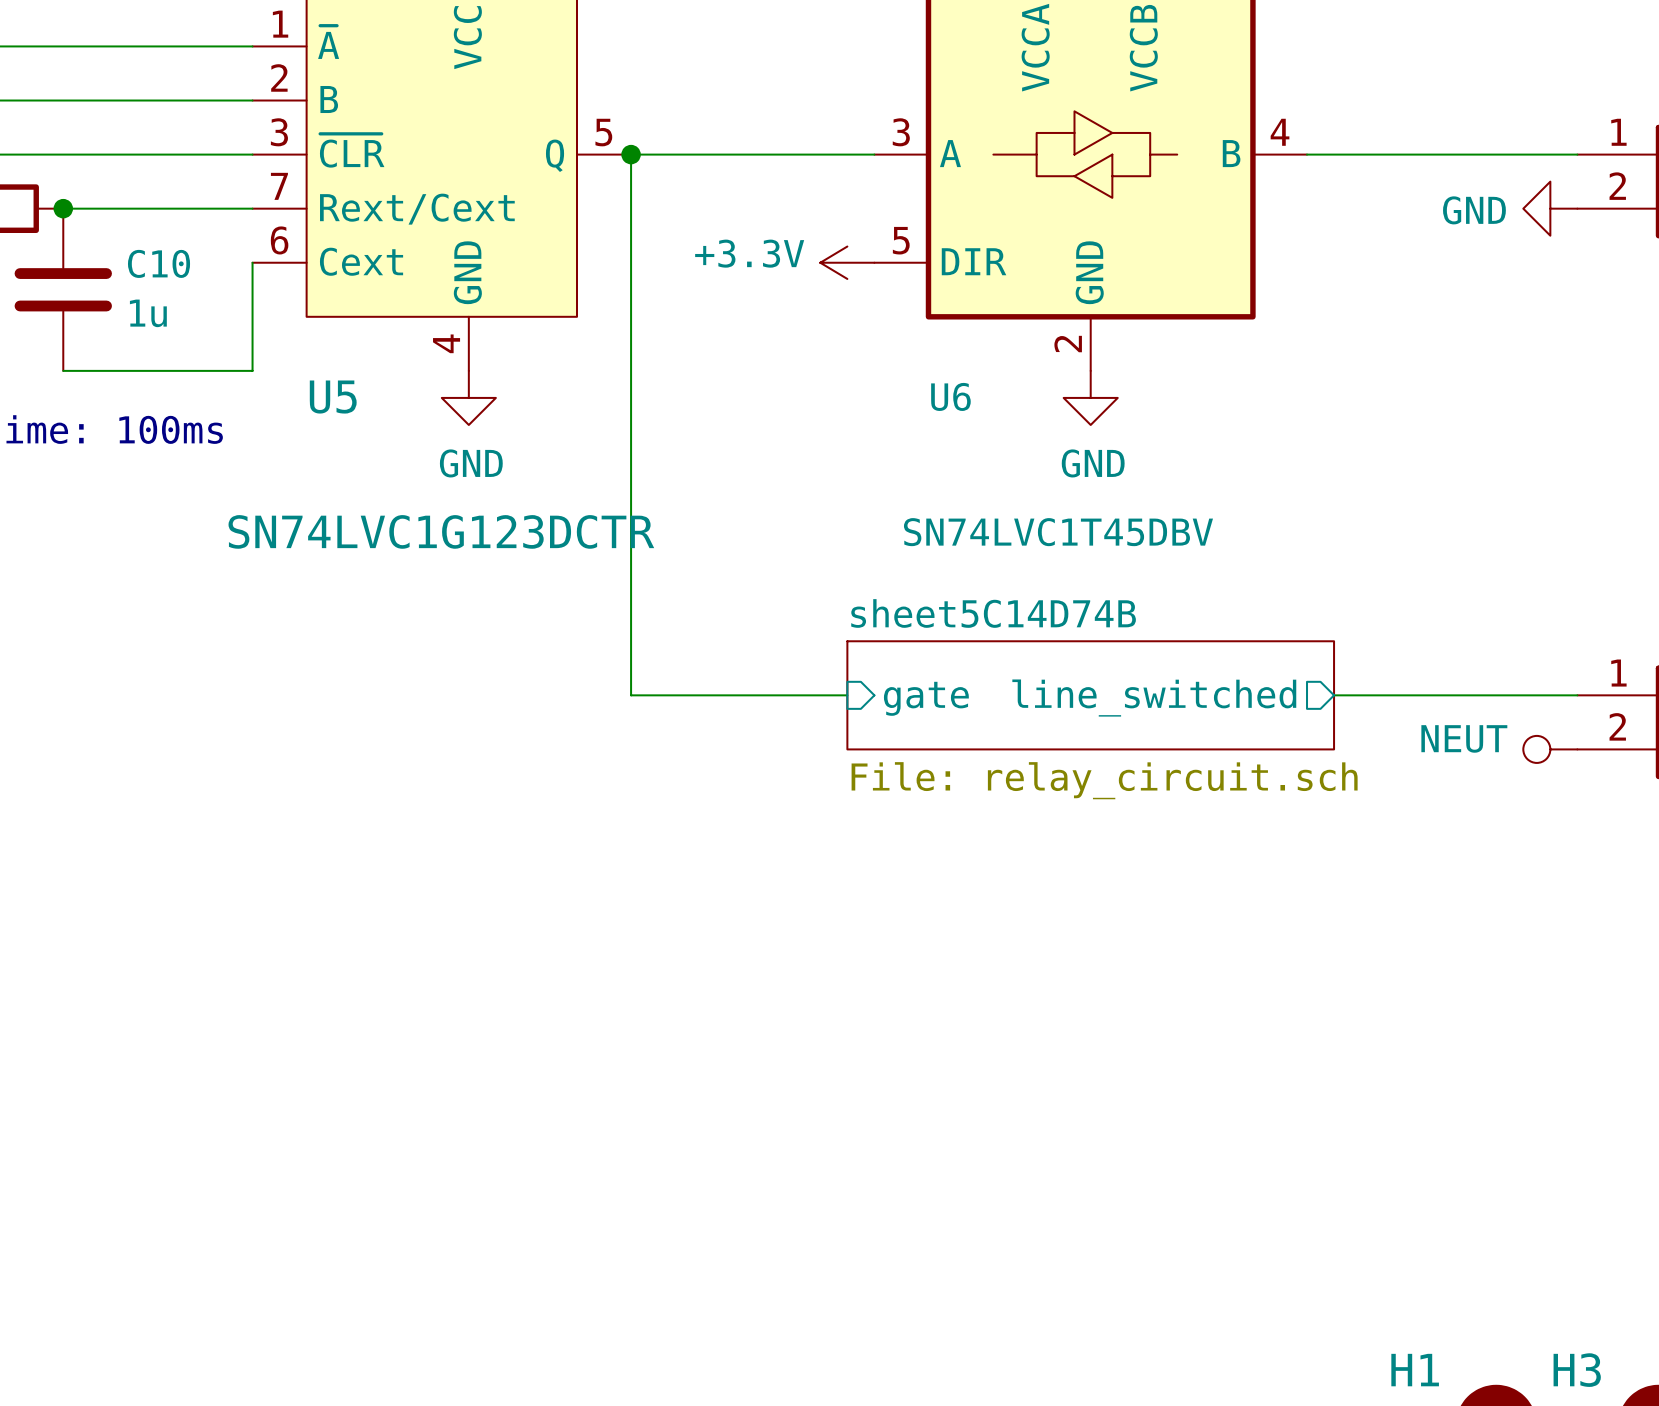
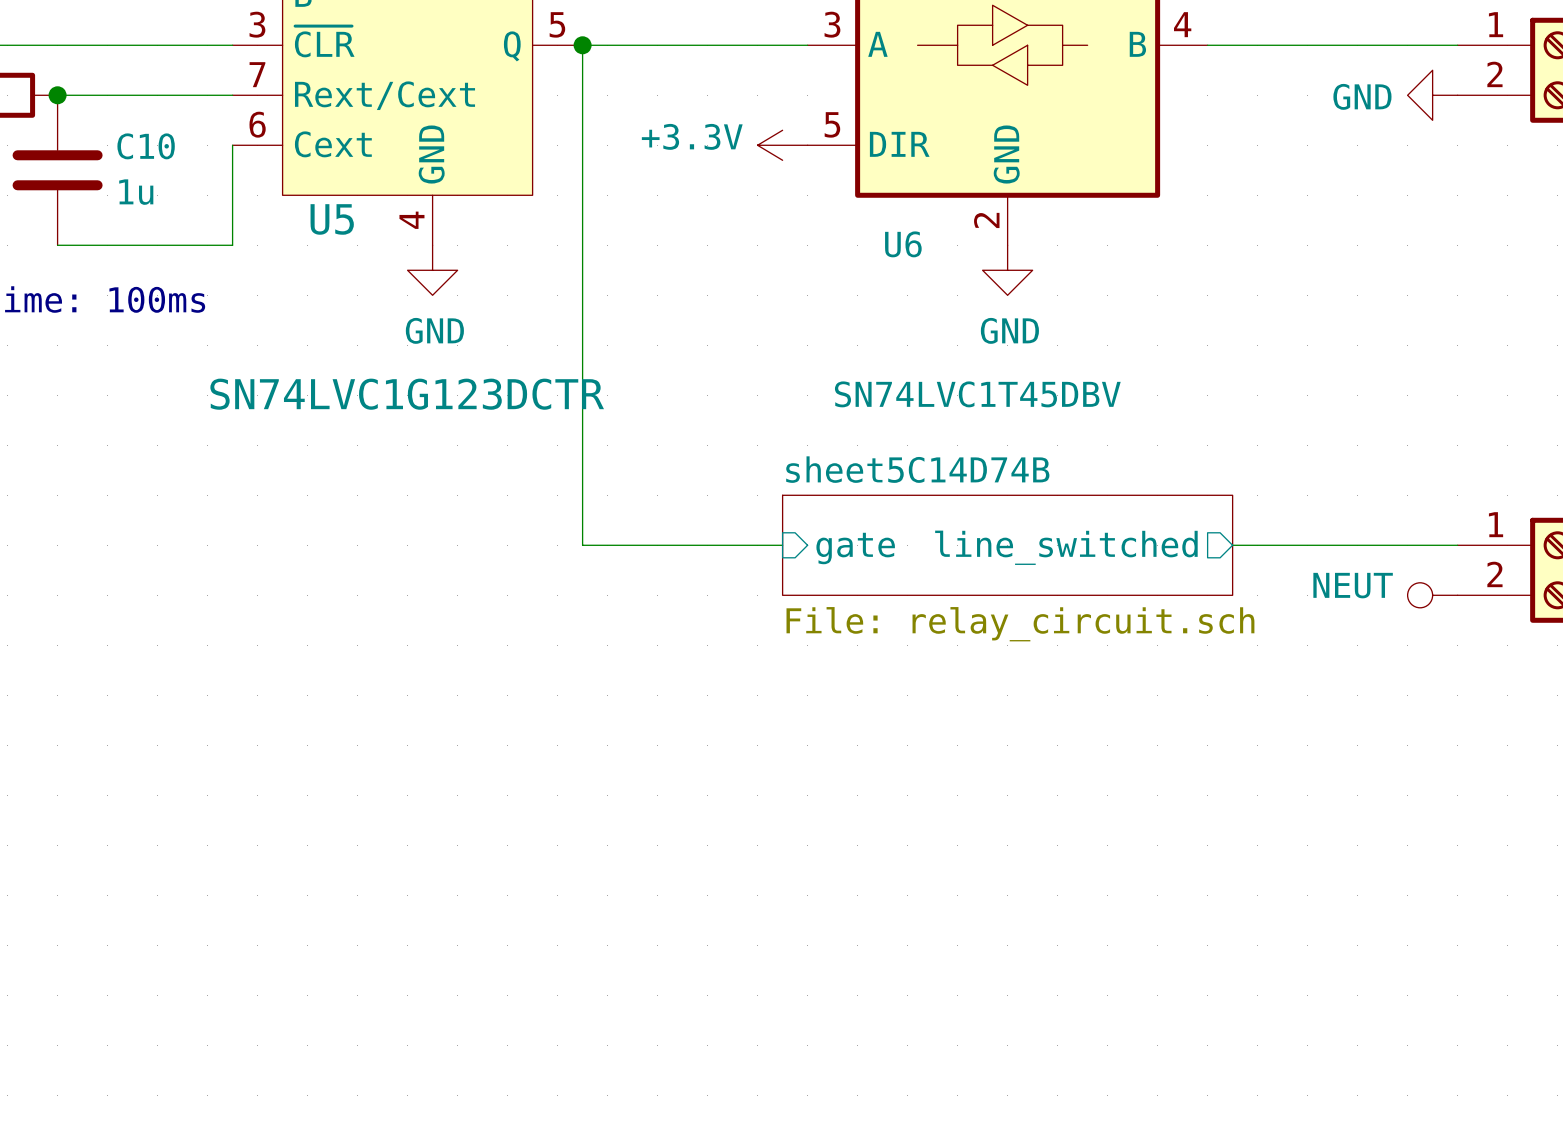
U6 name position: U6 (950, 396) -> U6 (903, 244)
U5 name position: U5 (333, 397) -> U5 (332, 219)

